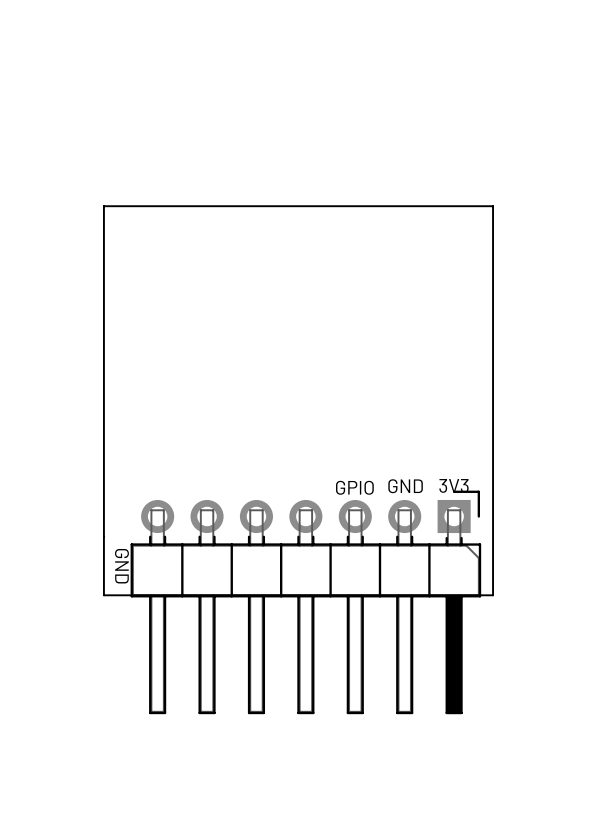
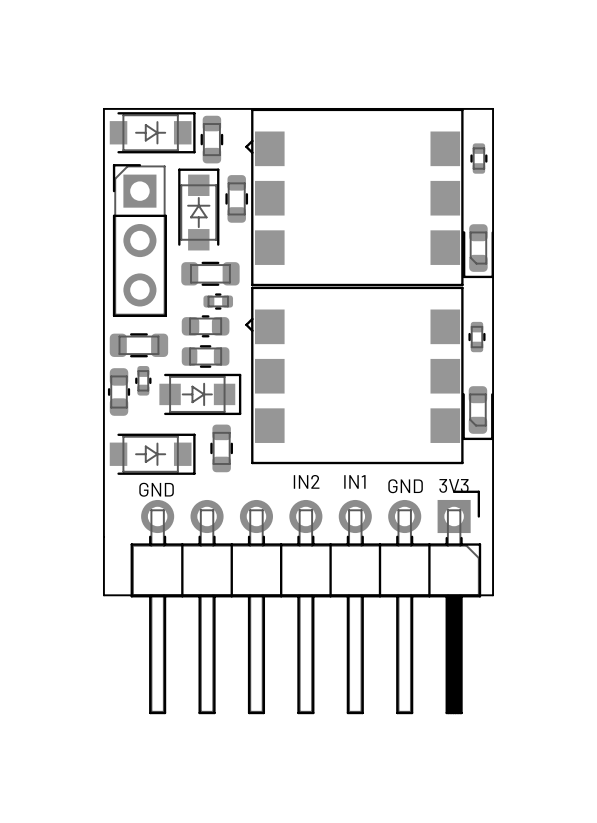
part: none -> (152, 132)
part: none -> (211, 139)
part: none -> (478, 158)
part: none -> (354, 197)
part: none -> (236, 198)
board edge: (103, 206) (493, 206) -> (103, 206) (103, 108) (493, 108) (493, 206)
part: none -> (198, 209)
part: none -> (139, 240)
part: none -> (478, 251)
part: none -> (210, 273)
part: none -> (218, 301)
part: none -> (205, 326)
part: none -> (476, 337)
part: none -> (138, 345)
part: none -> (205, 356)
part: none -> (354, 375)
part: none -> (143, 380)
part: none -> (119, 392)
part: none -> (200, 394)
part: none -> (477, 413)
part: none -> (221, 448)
part: none -> (152, 454)
text: none -> IN2 (306, 481)
text: GPIO (354, 487) -> IN1 (354, 481)
text rotation: 0° (121, 566) -> 90° counterclockwise (156, 489)
text position: GND (121, 566) -> GND (156, 489)

